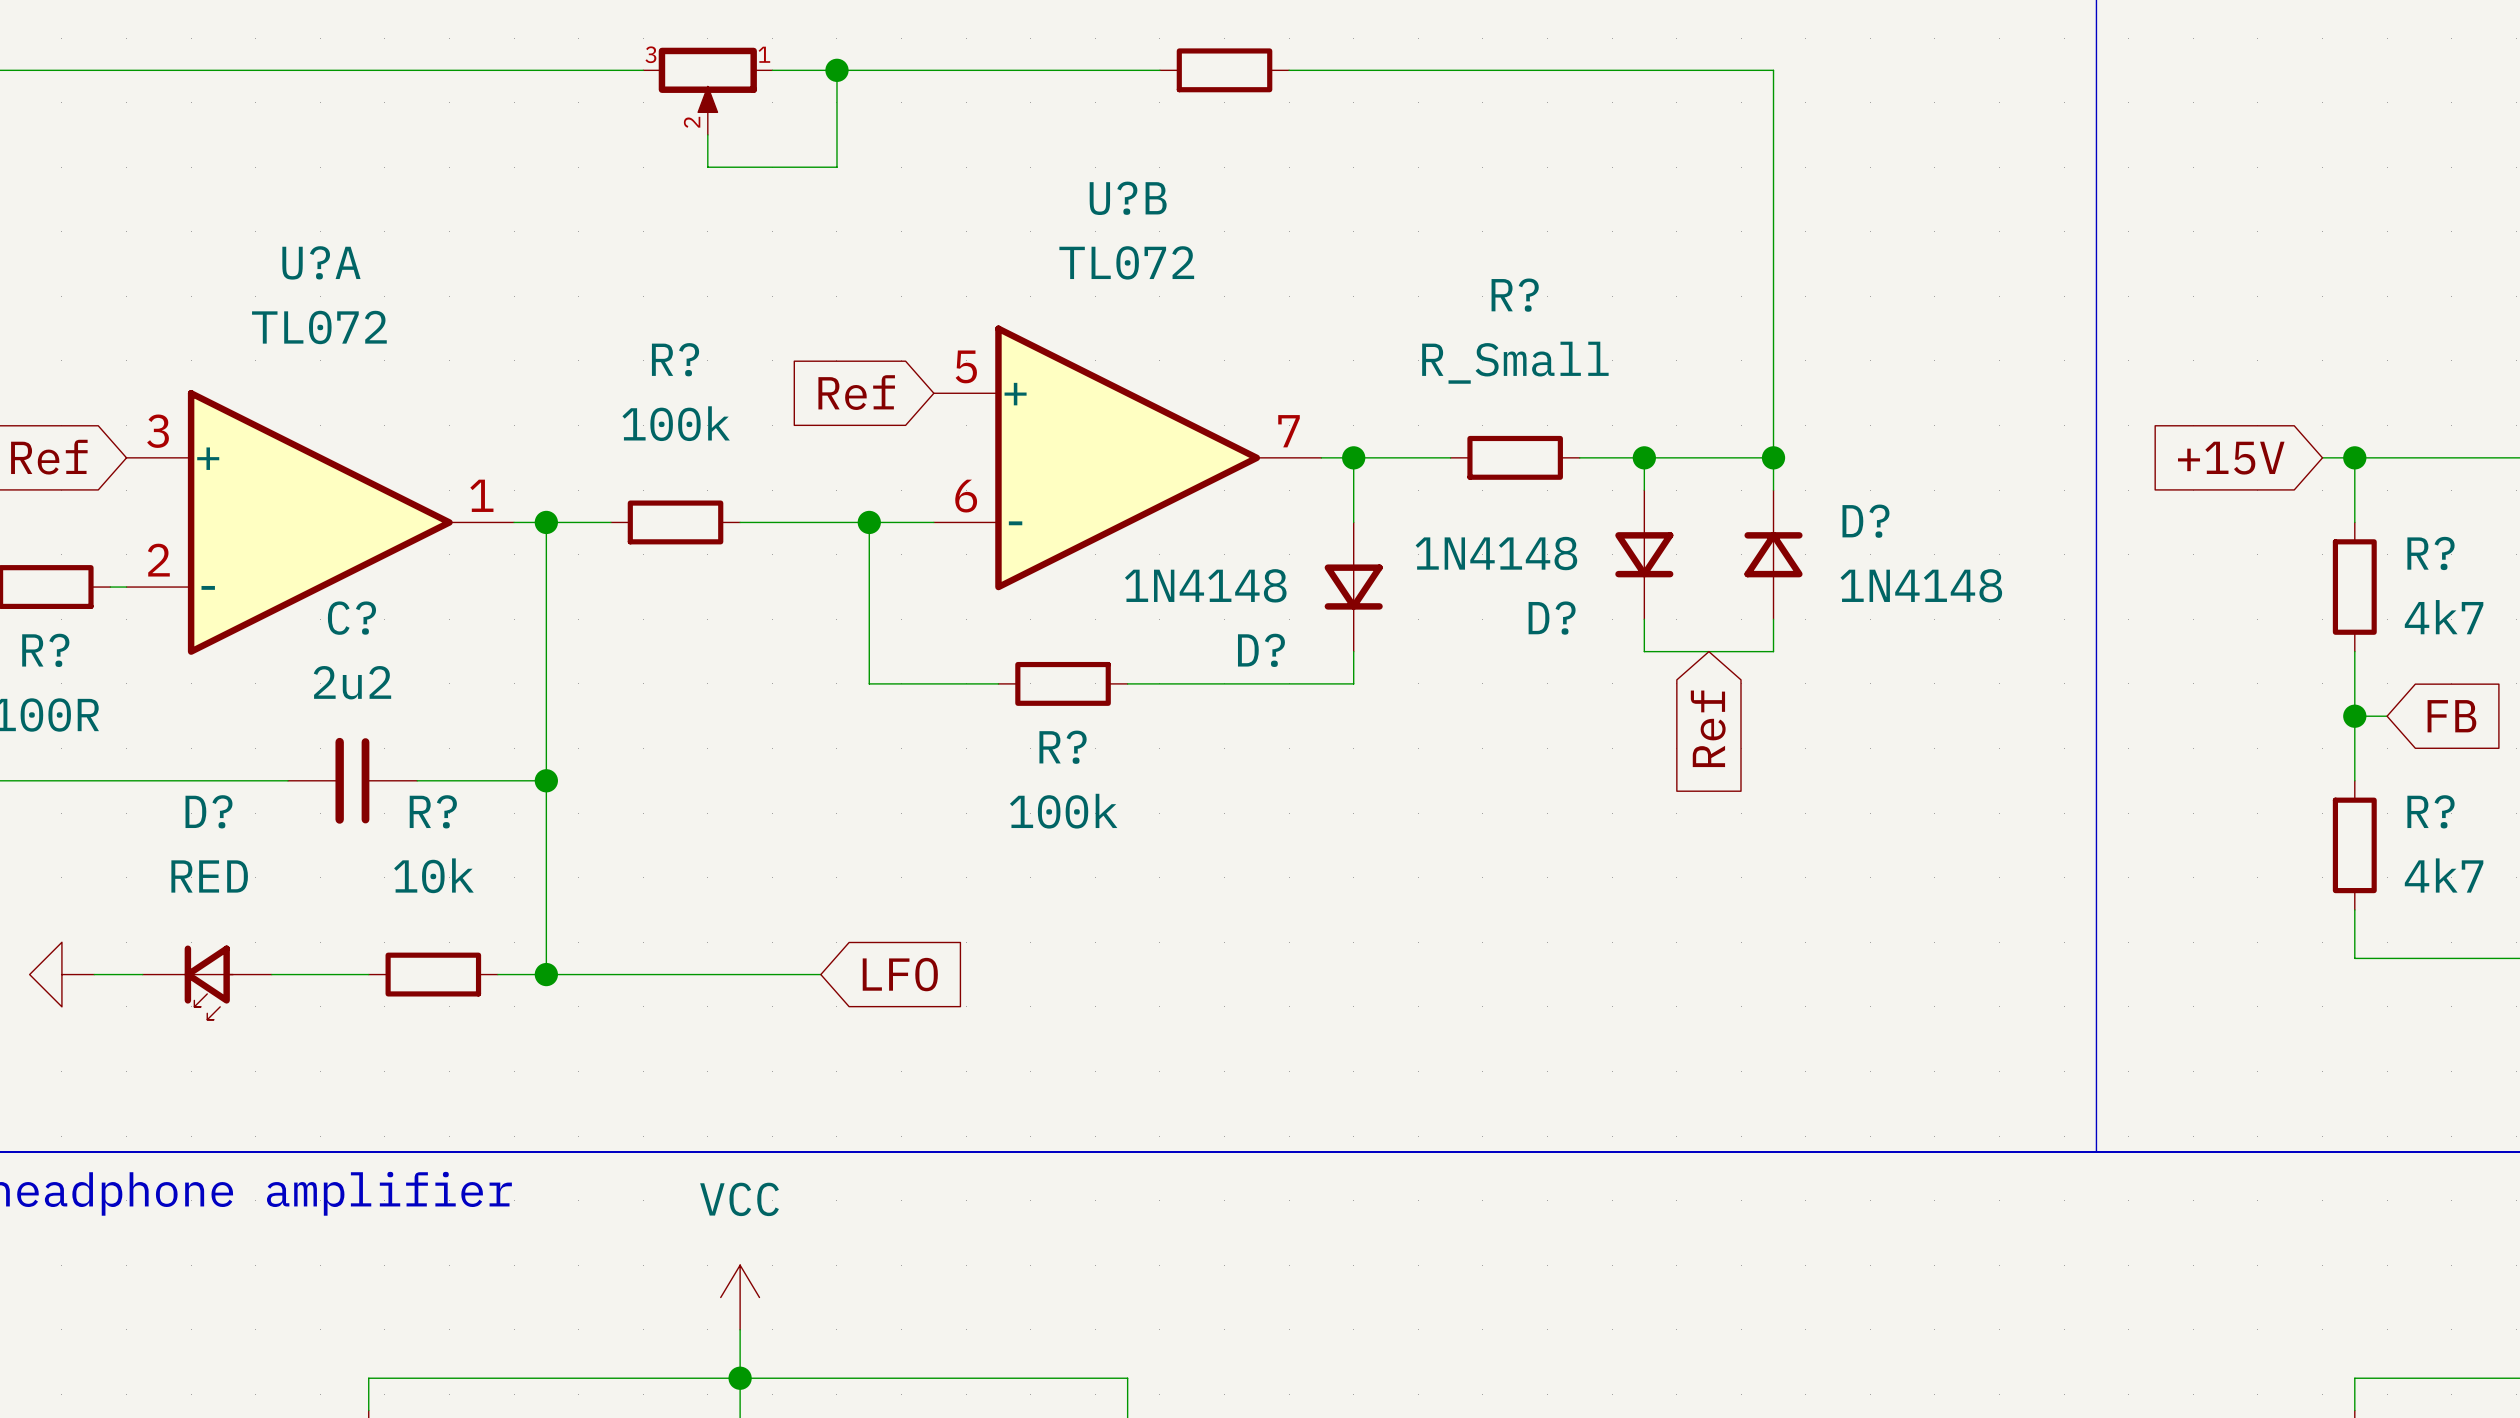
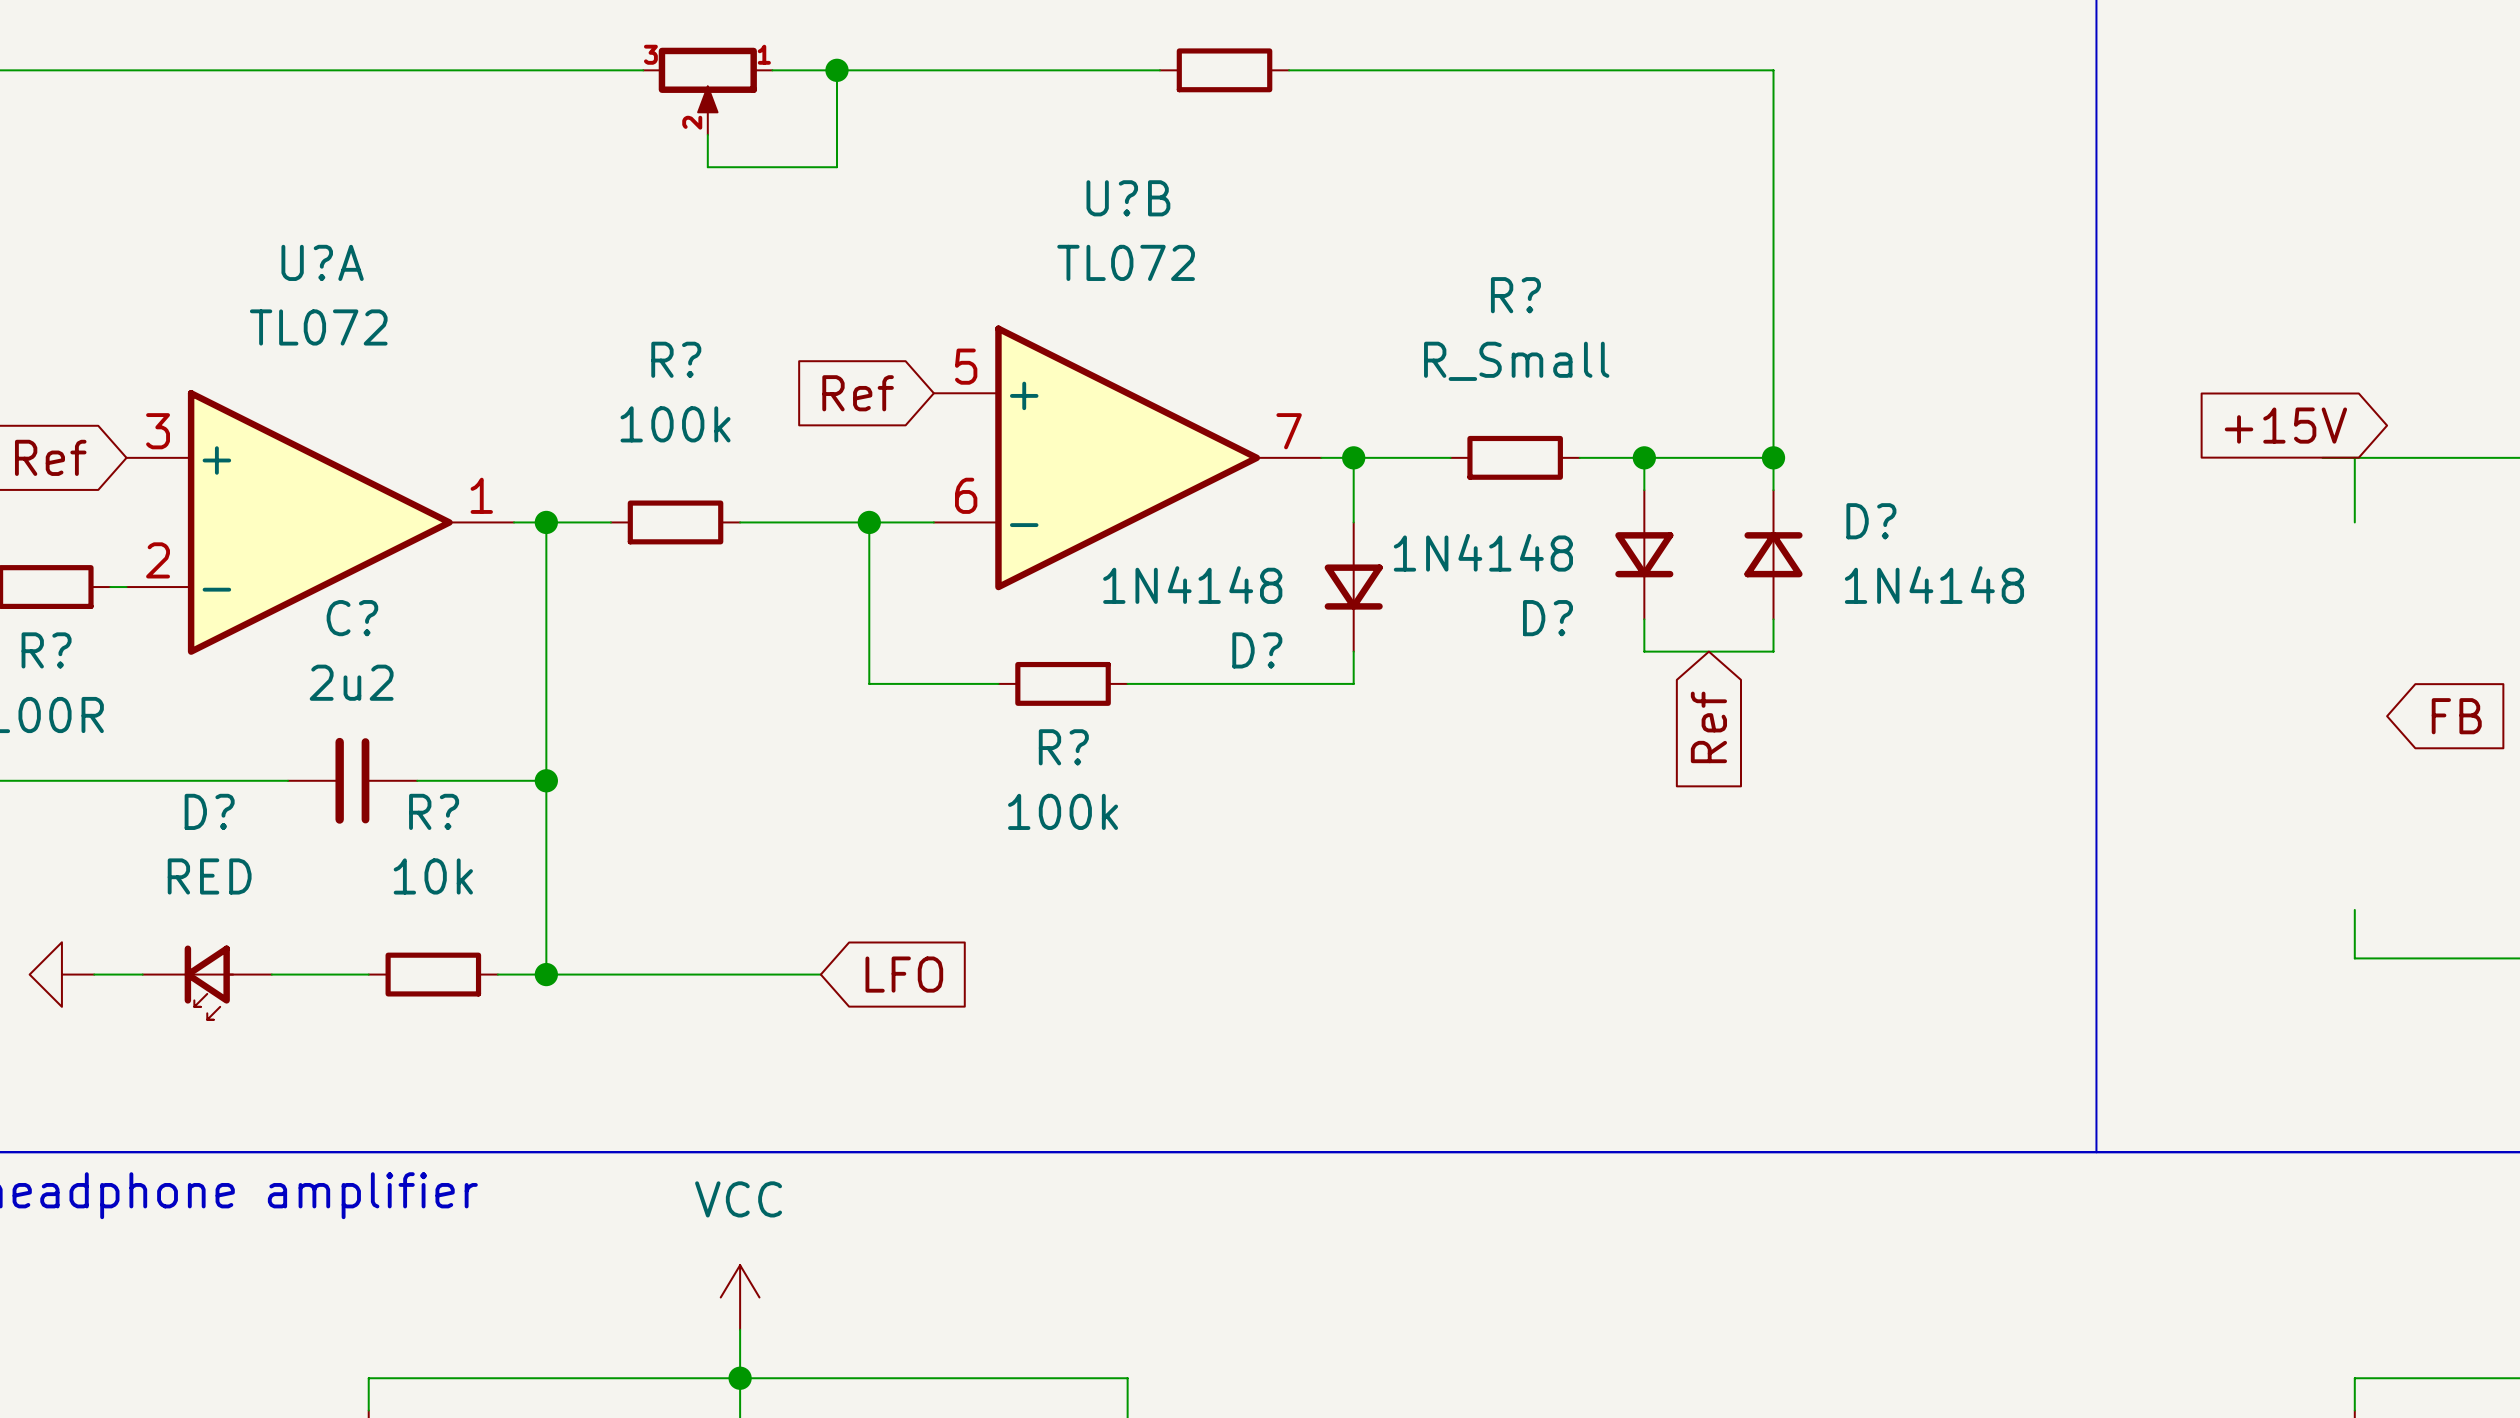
junction: (2354, 457) -> none
global label position: +15V (2231, 458) -> +15V (2285, 425)
R?: 4k7 (2354, 587) -> none
wire: (2354, 651) (2354, 780) -> none
wire: (2354, 716) (2387, 716) -> none
junction: (2354, 716) -> none
R?: 4k7 (2354, 845) -> none

